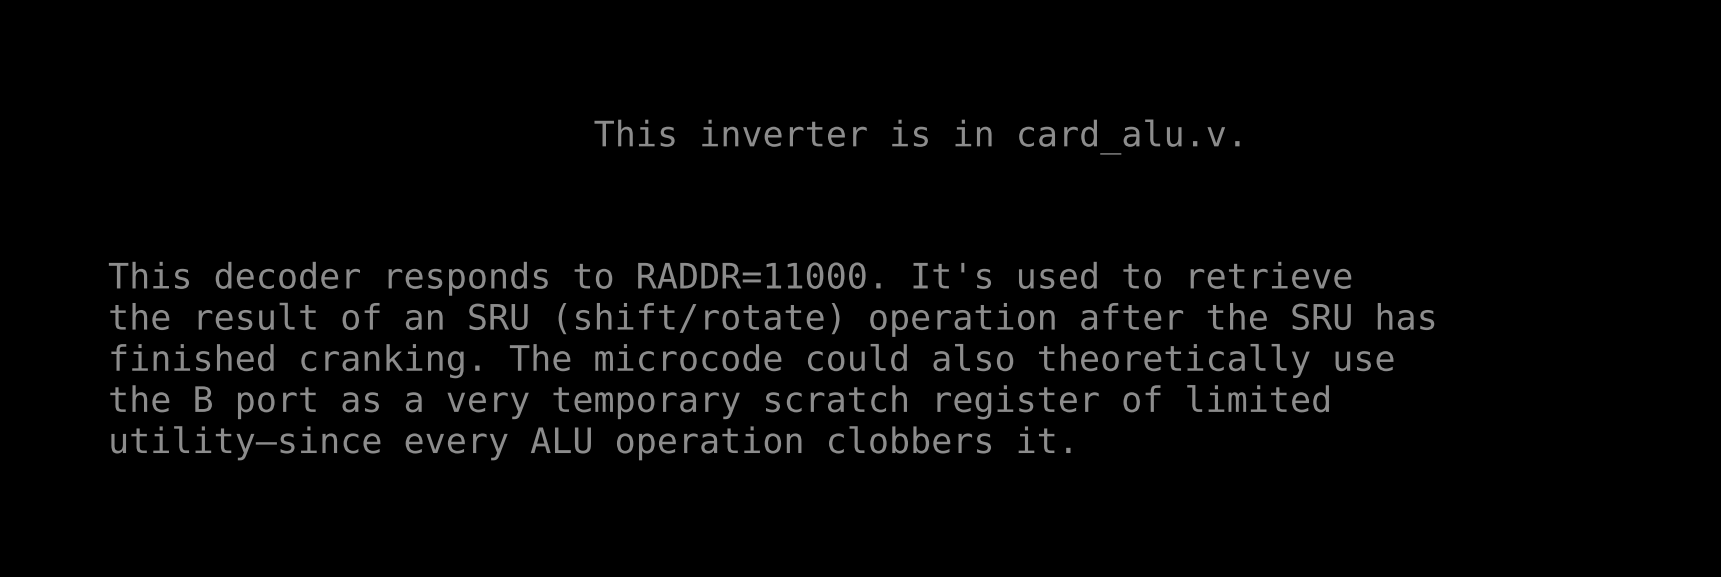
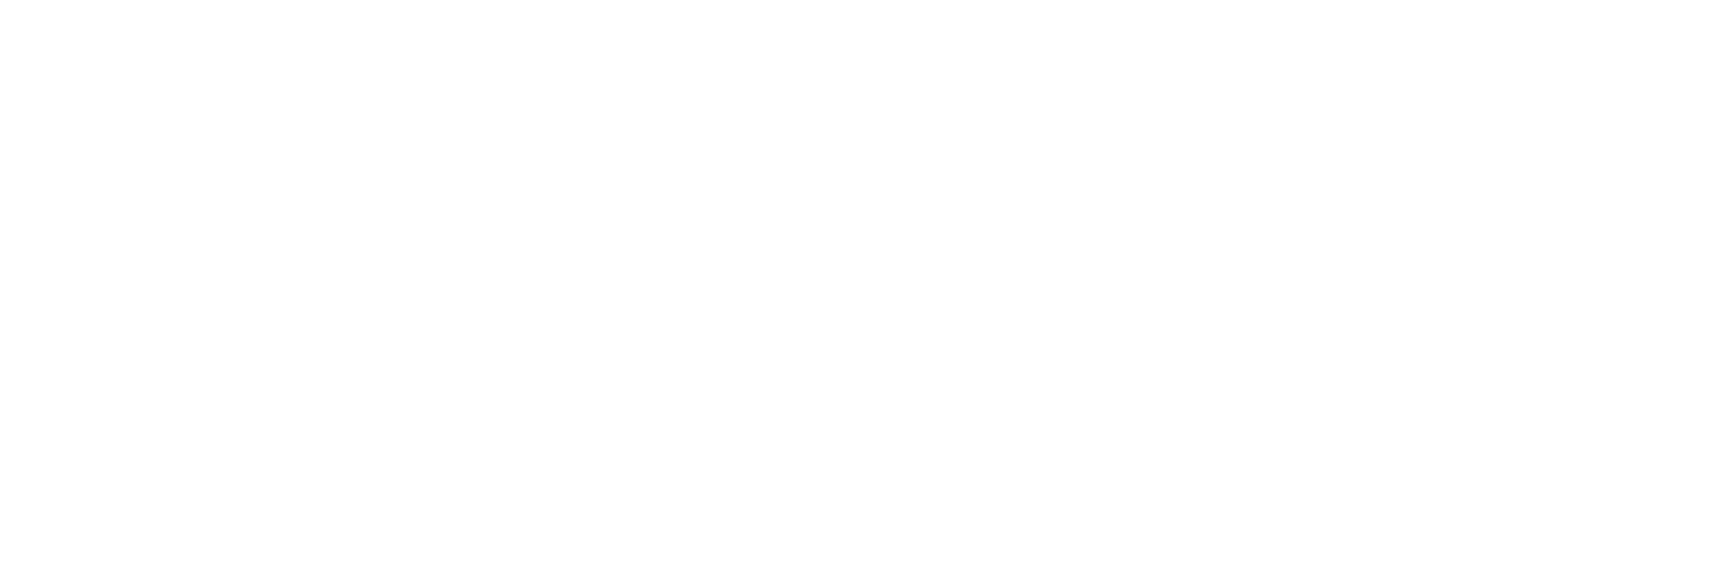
text: This inverter is in card_alu.v. (917, 137) -> none
text: This decoder responds to RADDR=11000. It's used to retrieve (730, 278) -> none
text: the result of an SRU (shift/rotate) operation after the SRU has (772, 319) -> none
text: finished cranking. The microcode could also theoretically use (752, 361) -> none
text: the B port as a very temporary scratch register of limited (719, 402) -> none
text: utility—since every ALU operation clobbers it. (590, 443) -> none

